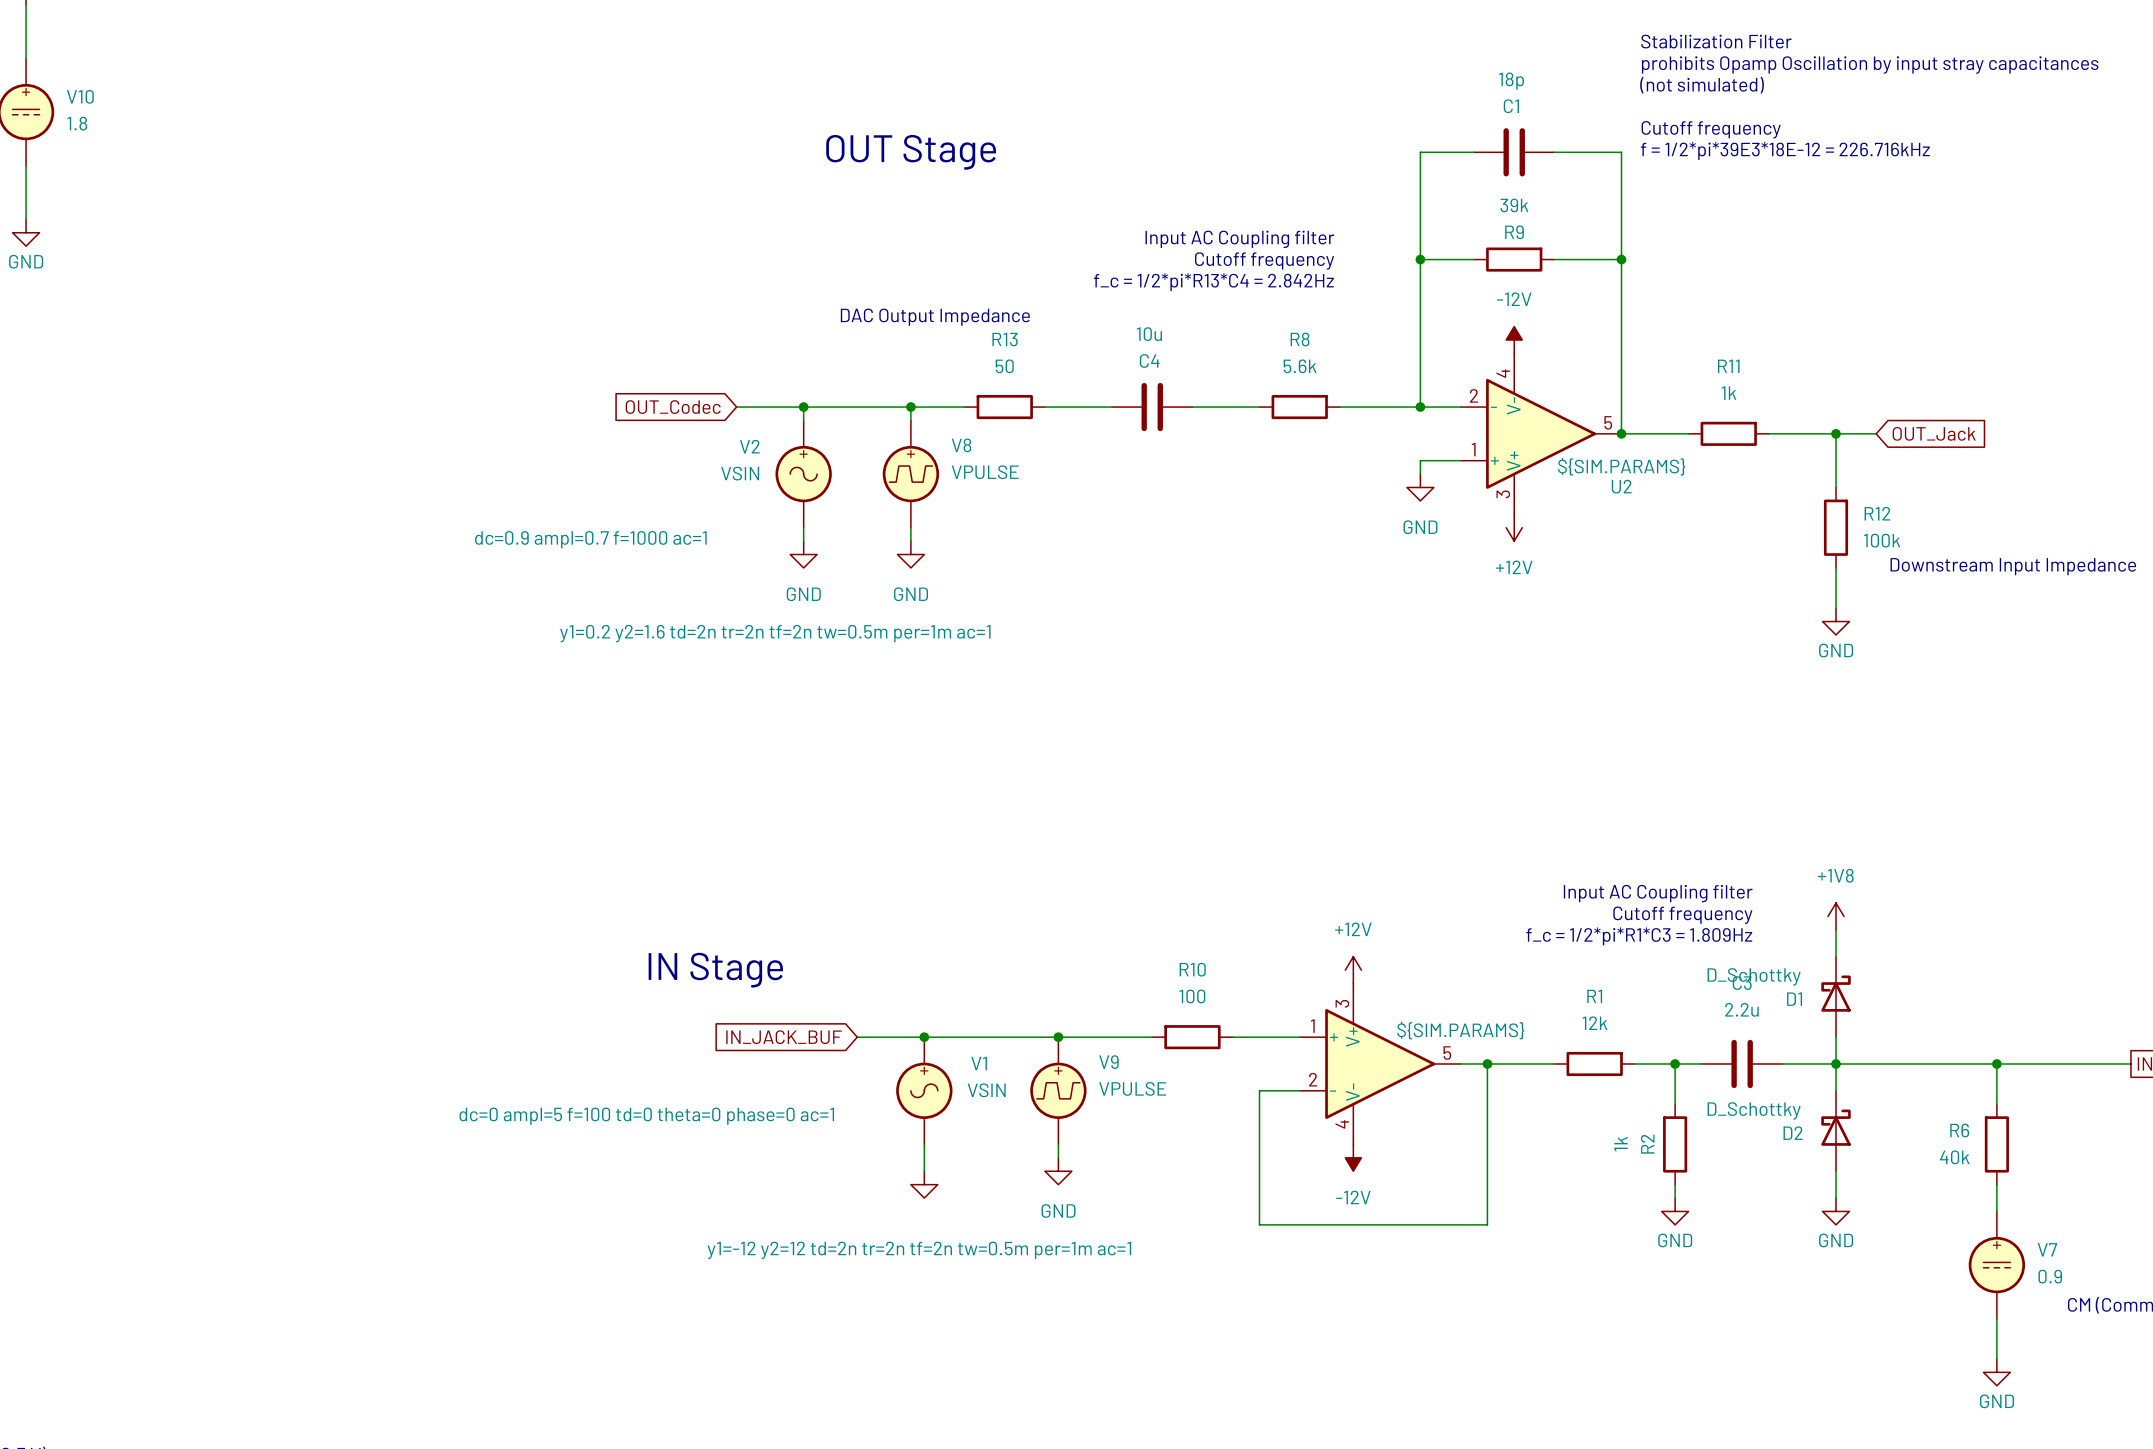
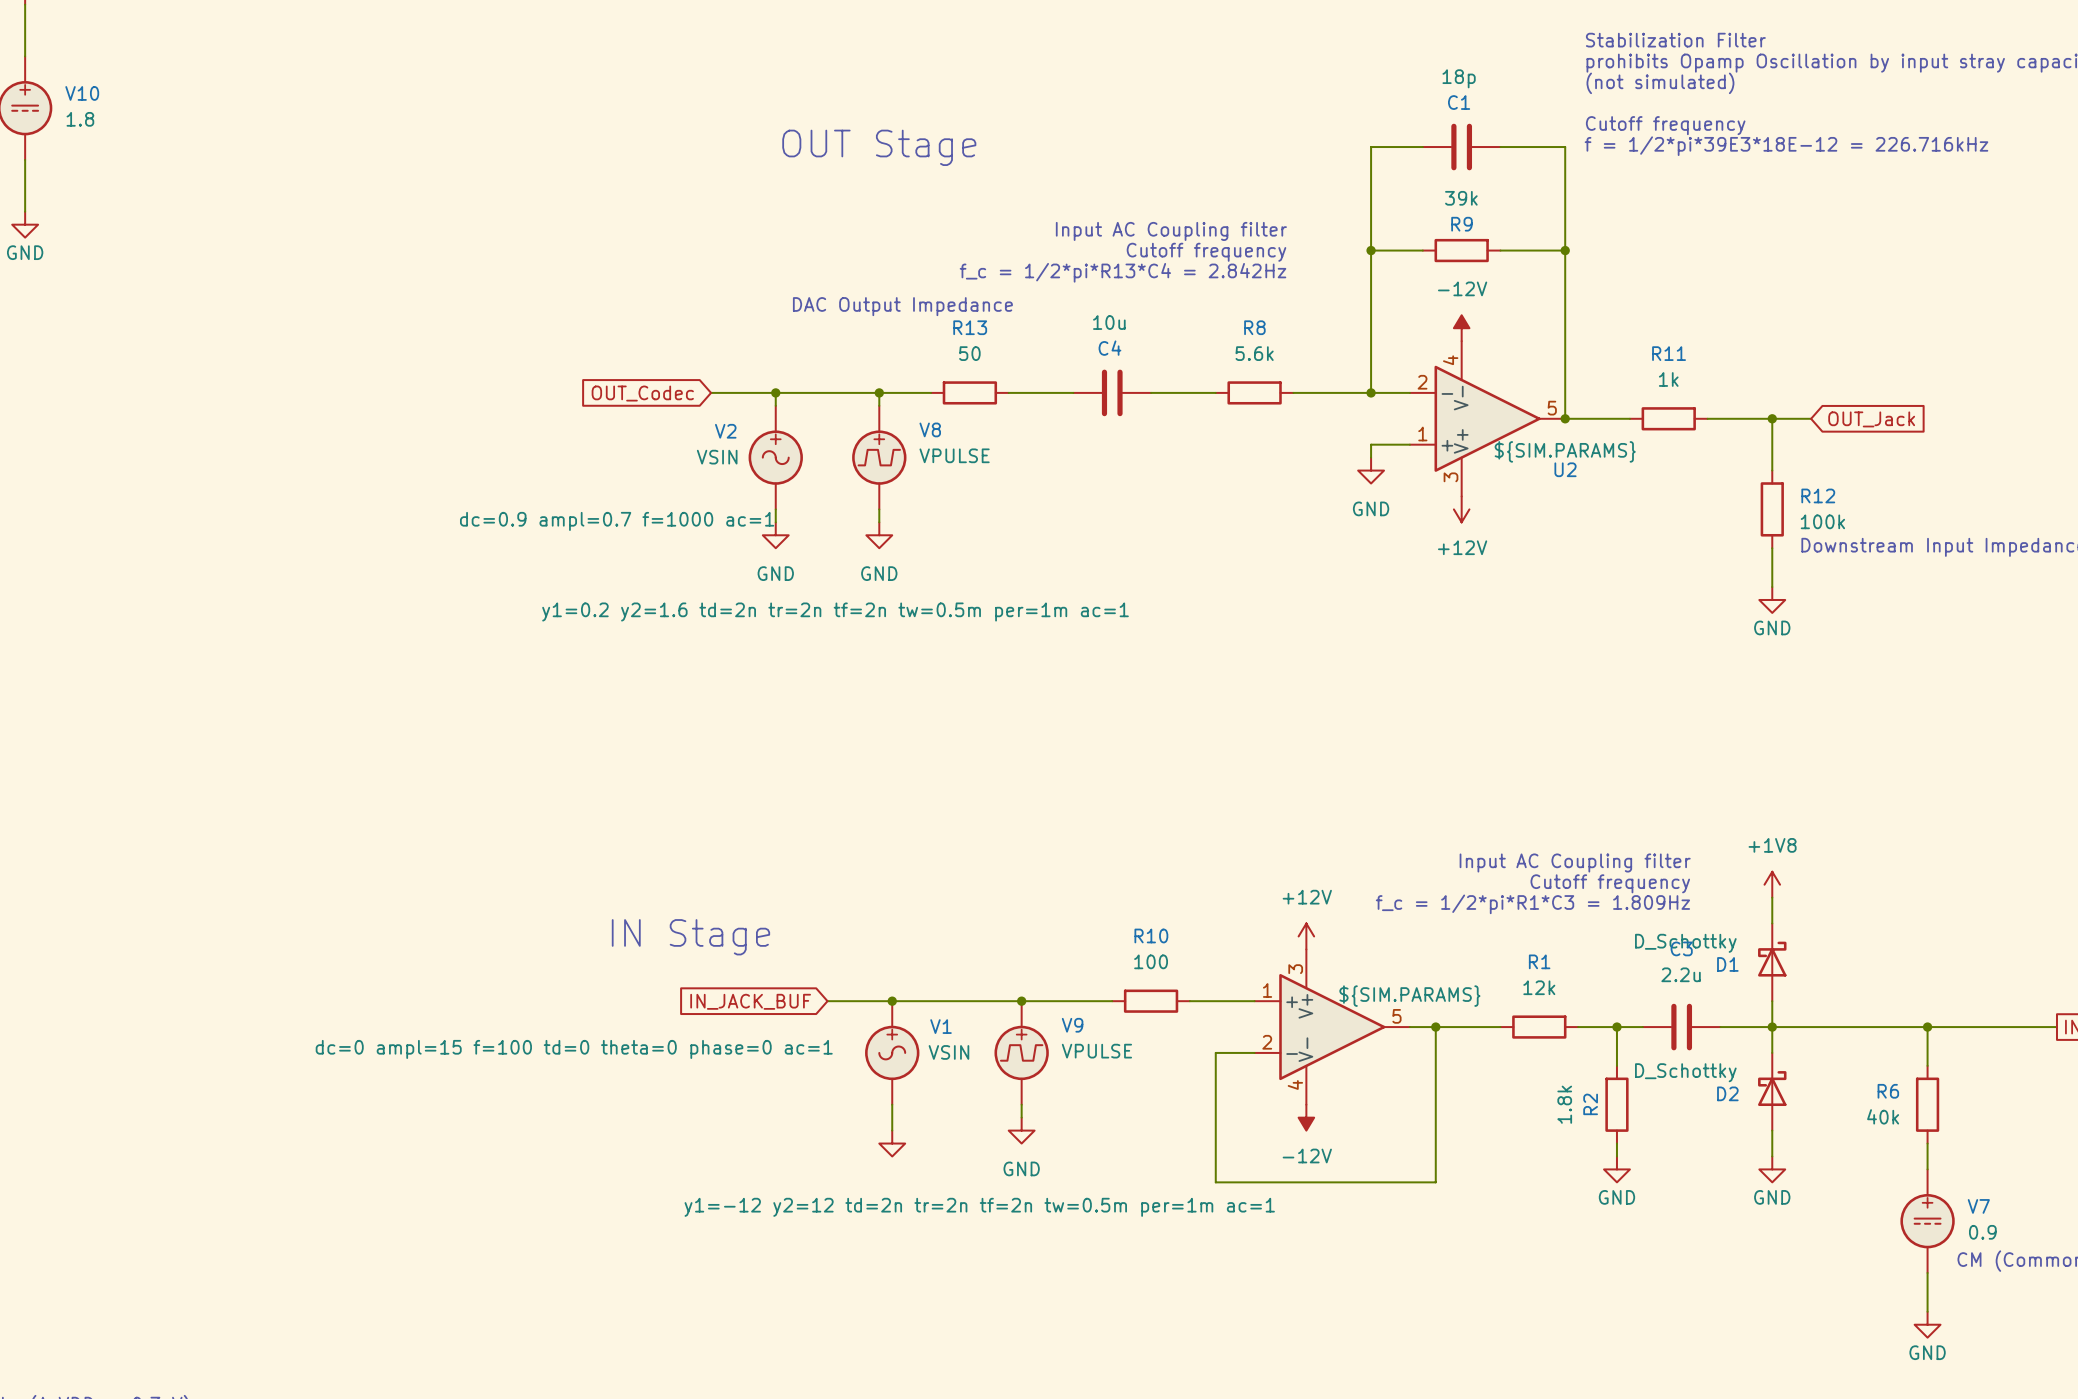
V1 text: dc=0 ampl=5 f=100 td=0 theta=0 phase=0 ac=1 (646, 1116) -> dc=0 ampl=15 f=100 td=0 theta=0 phase=0 ac=1 (574, 1049)
R2 value: 1k (1620, 1144) -> 1.8k (1564, 1104)

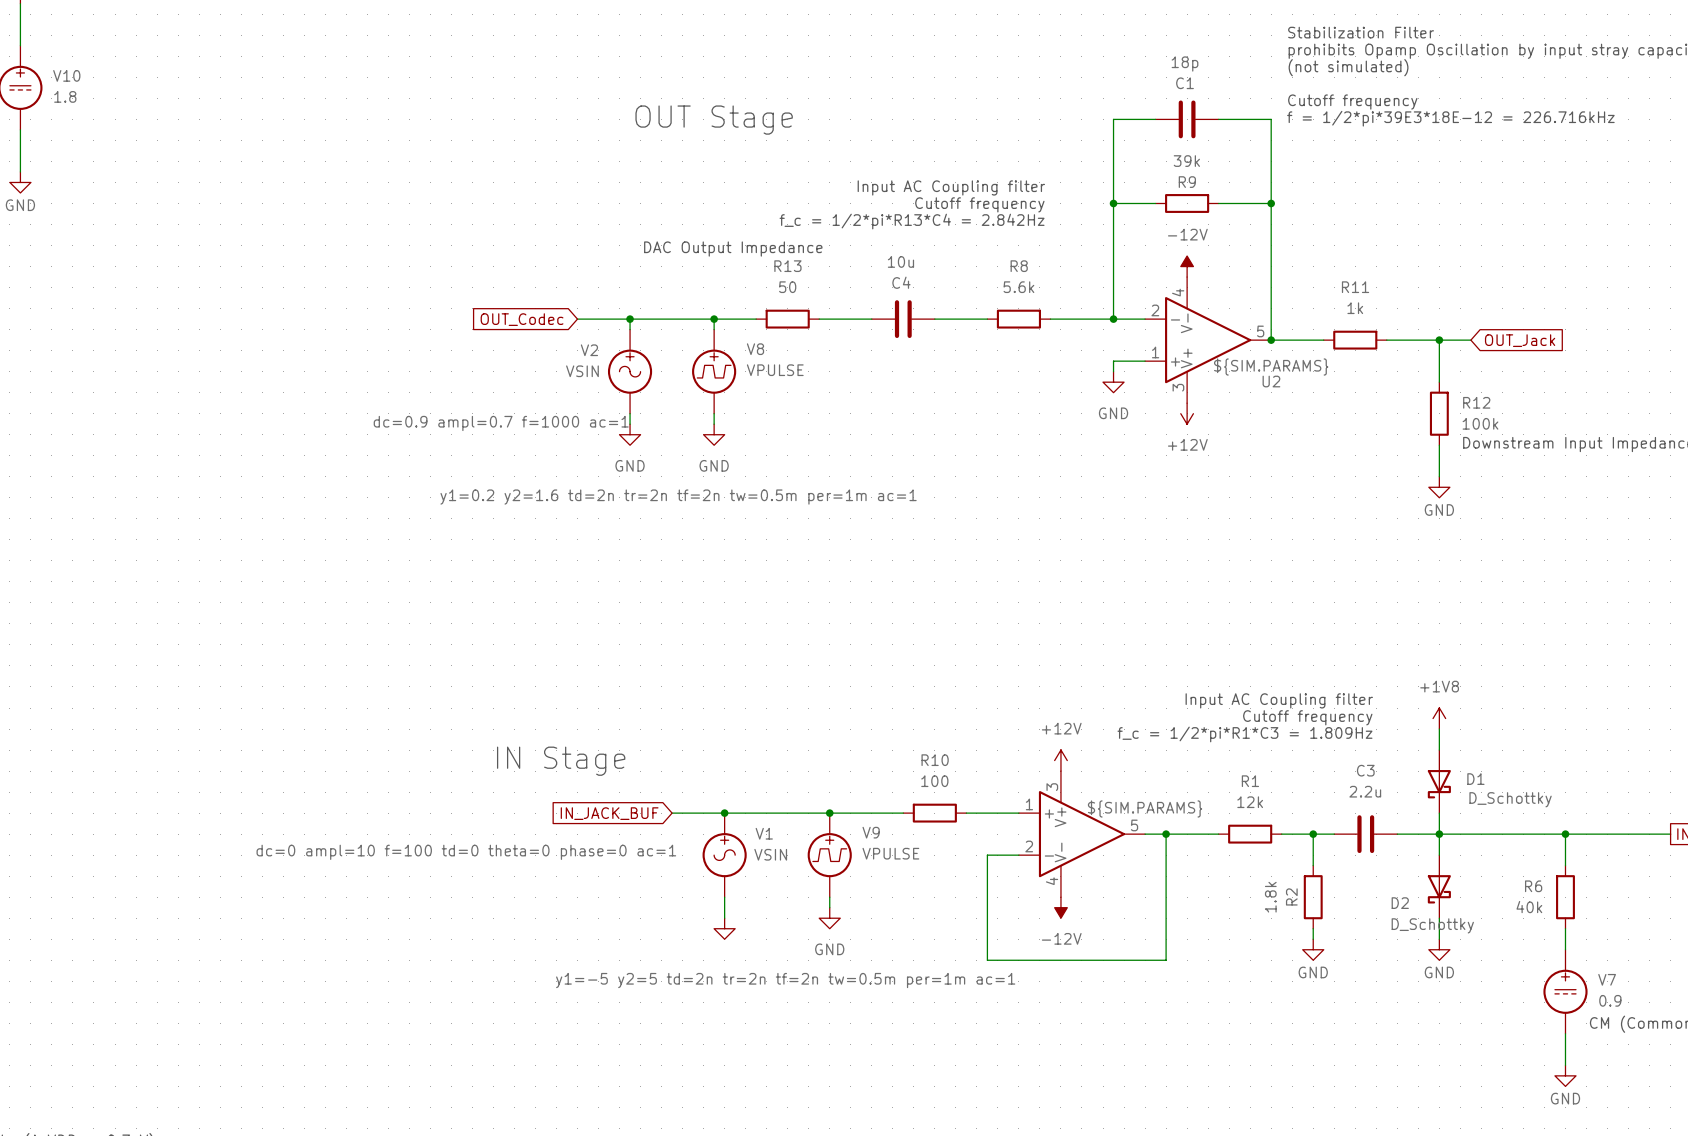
D1 rotation: 0° (1772, 959) -> 180° (1439, 784)
V1 text: dc=0 ampl=15 f=100 td=0 theta=0 phase=0 ac=1 (574, 1049) -> dc=0 ampl=10 f=100 td=0 theta=0 phase=0 ac=1 (466, 852)
D2 value position: D_Schottky (1685, 1072) -> D_Schottky (1432, 925)
D2 rotation: 0° (1772, 1088) -> 180° (1439, 889)
V9 text: y1=-12 y2=12 td=2n tr=2n tf=2n tw=0.5m per=1m ac=1 (979, 1207) -> y1=-5 y2=5 td=2n tr=2n tf=2n tw=0.5m per=1m ac=1 (785, 980)

